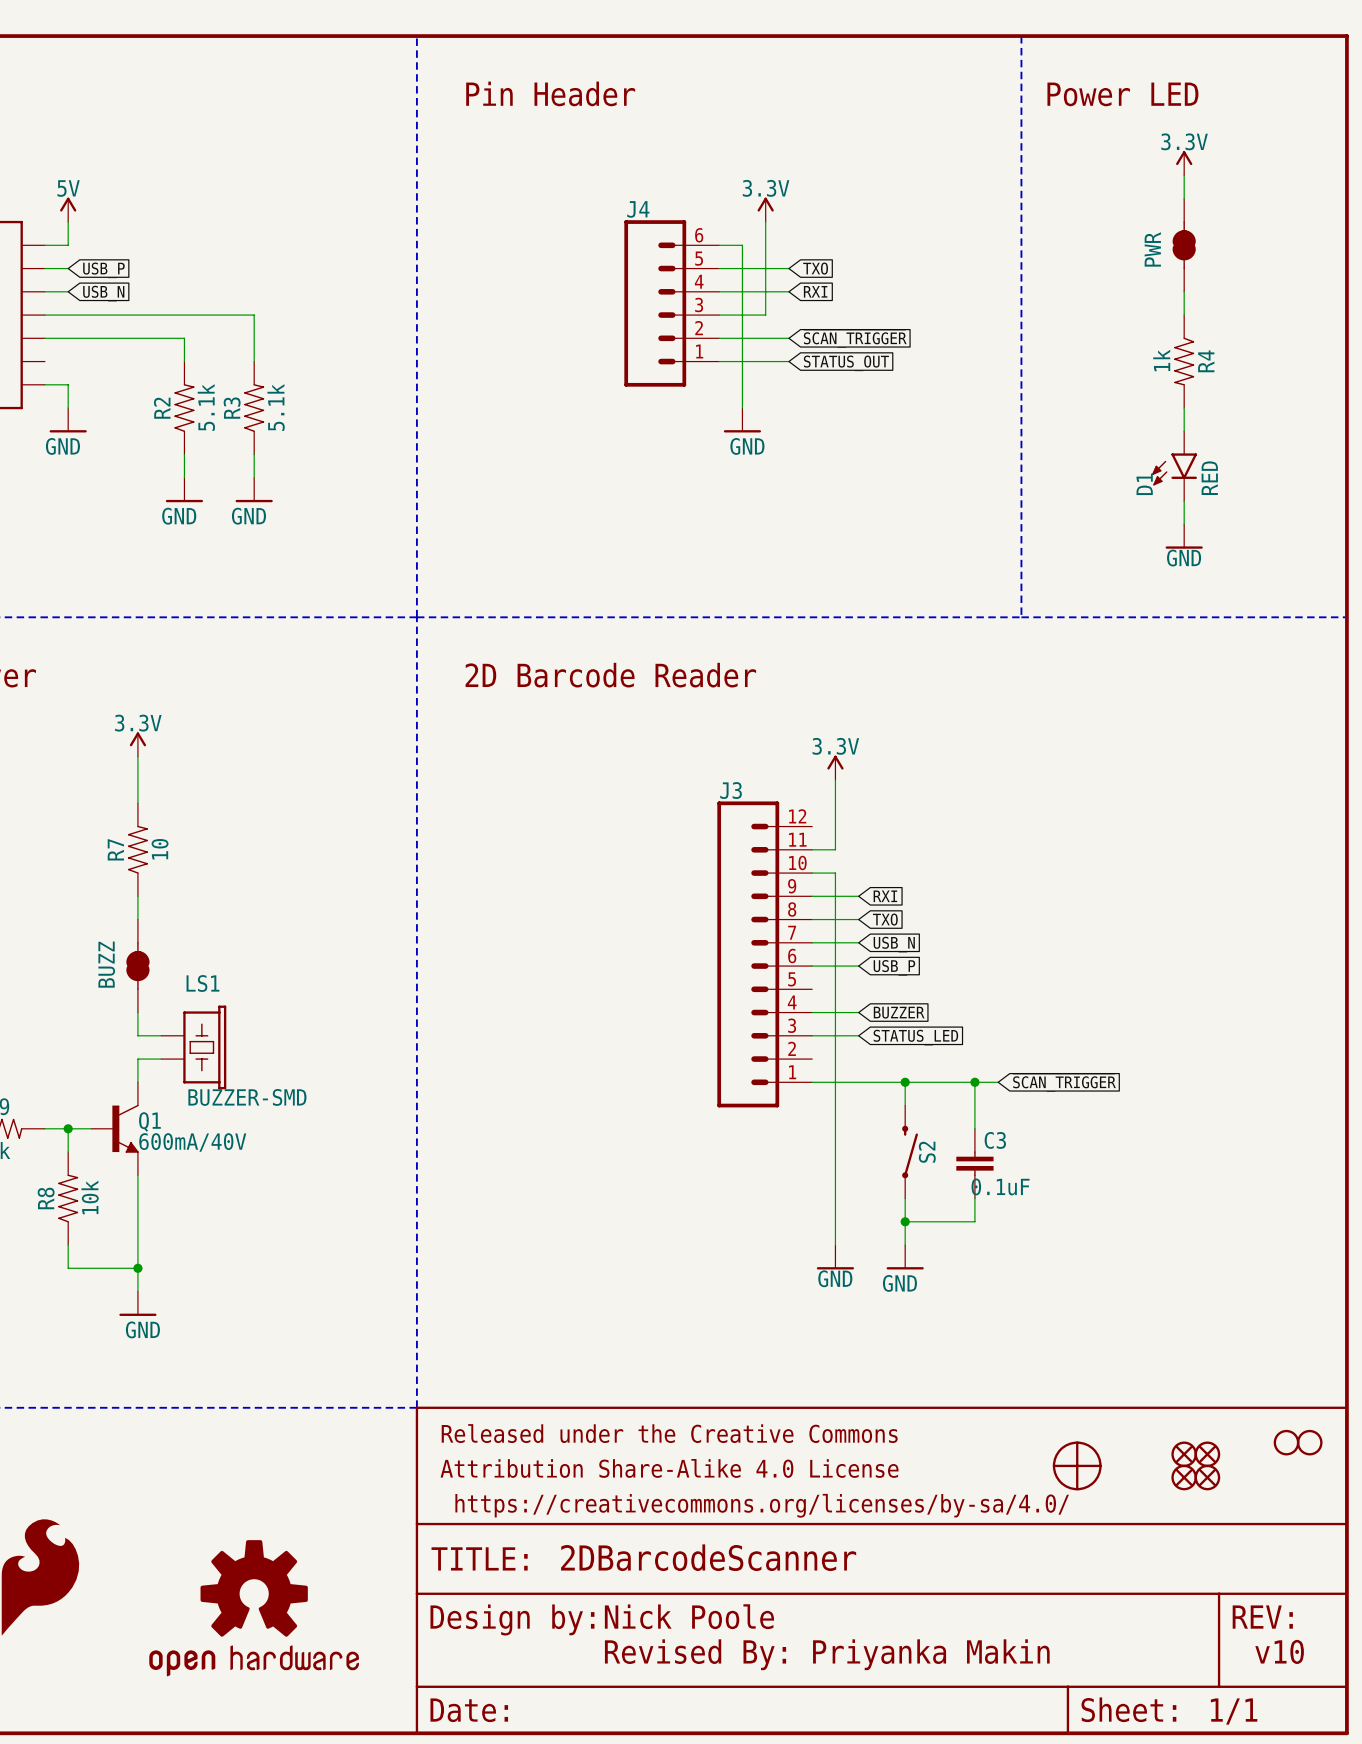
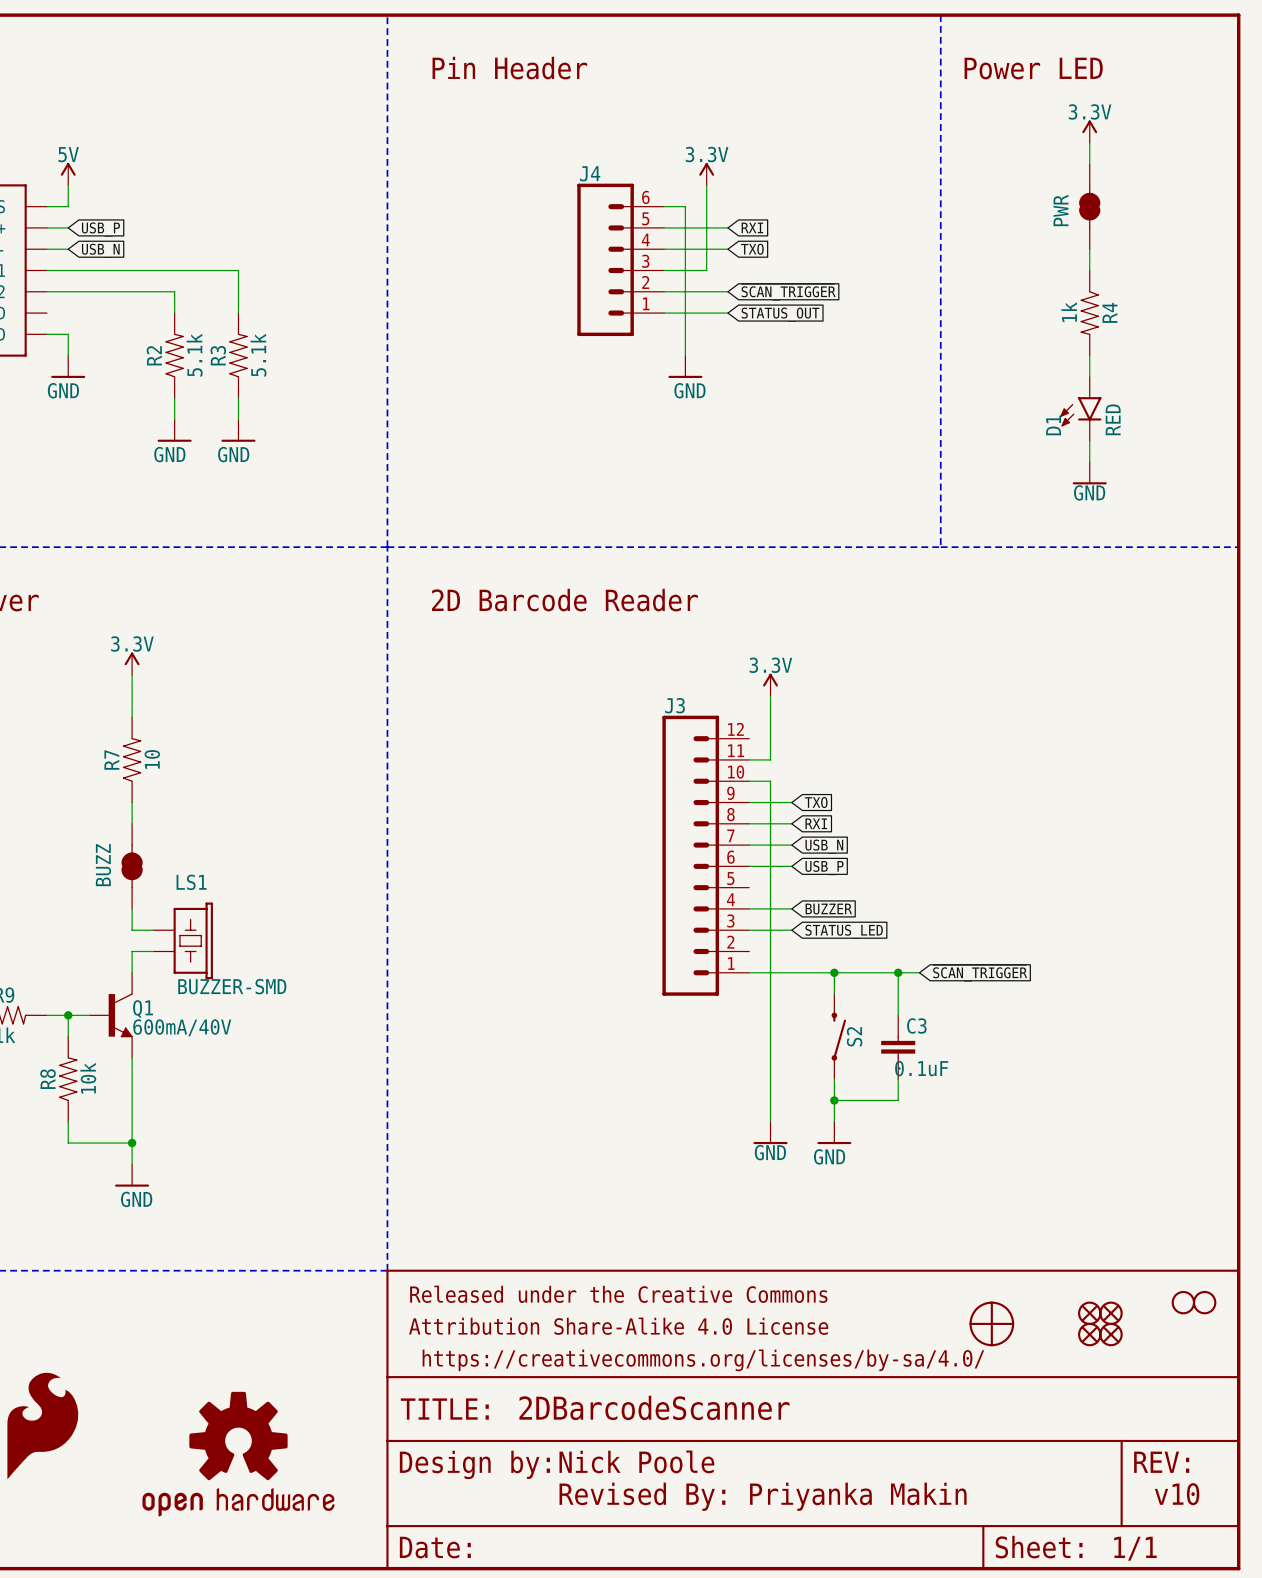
global label: TXO (815, 268) -> RXI (752, 227)
global label: RXI (815, 291) -> TXO (752, 249)
global label: RXI (885, 896) -> TXO (816, 802)
global label: TXO (885, 919) -> RXI (816, 823)

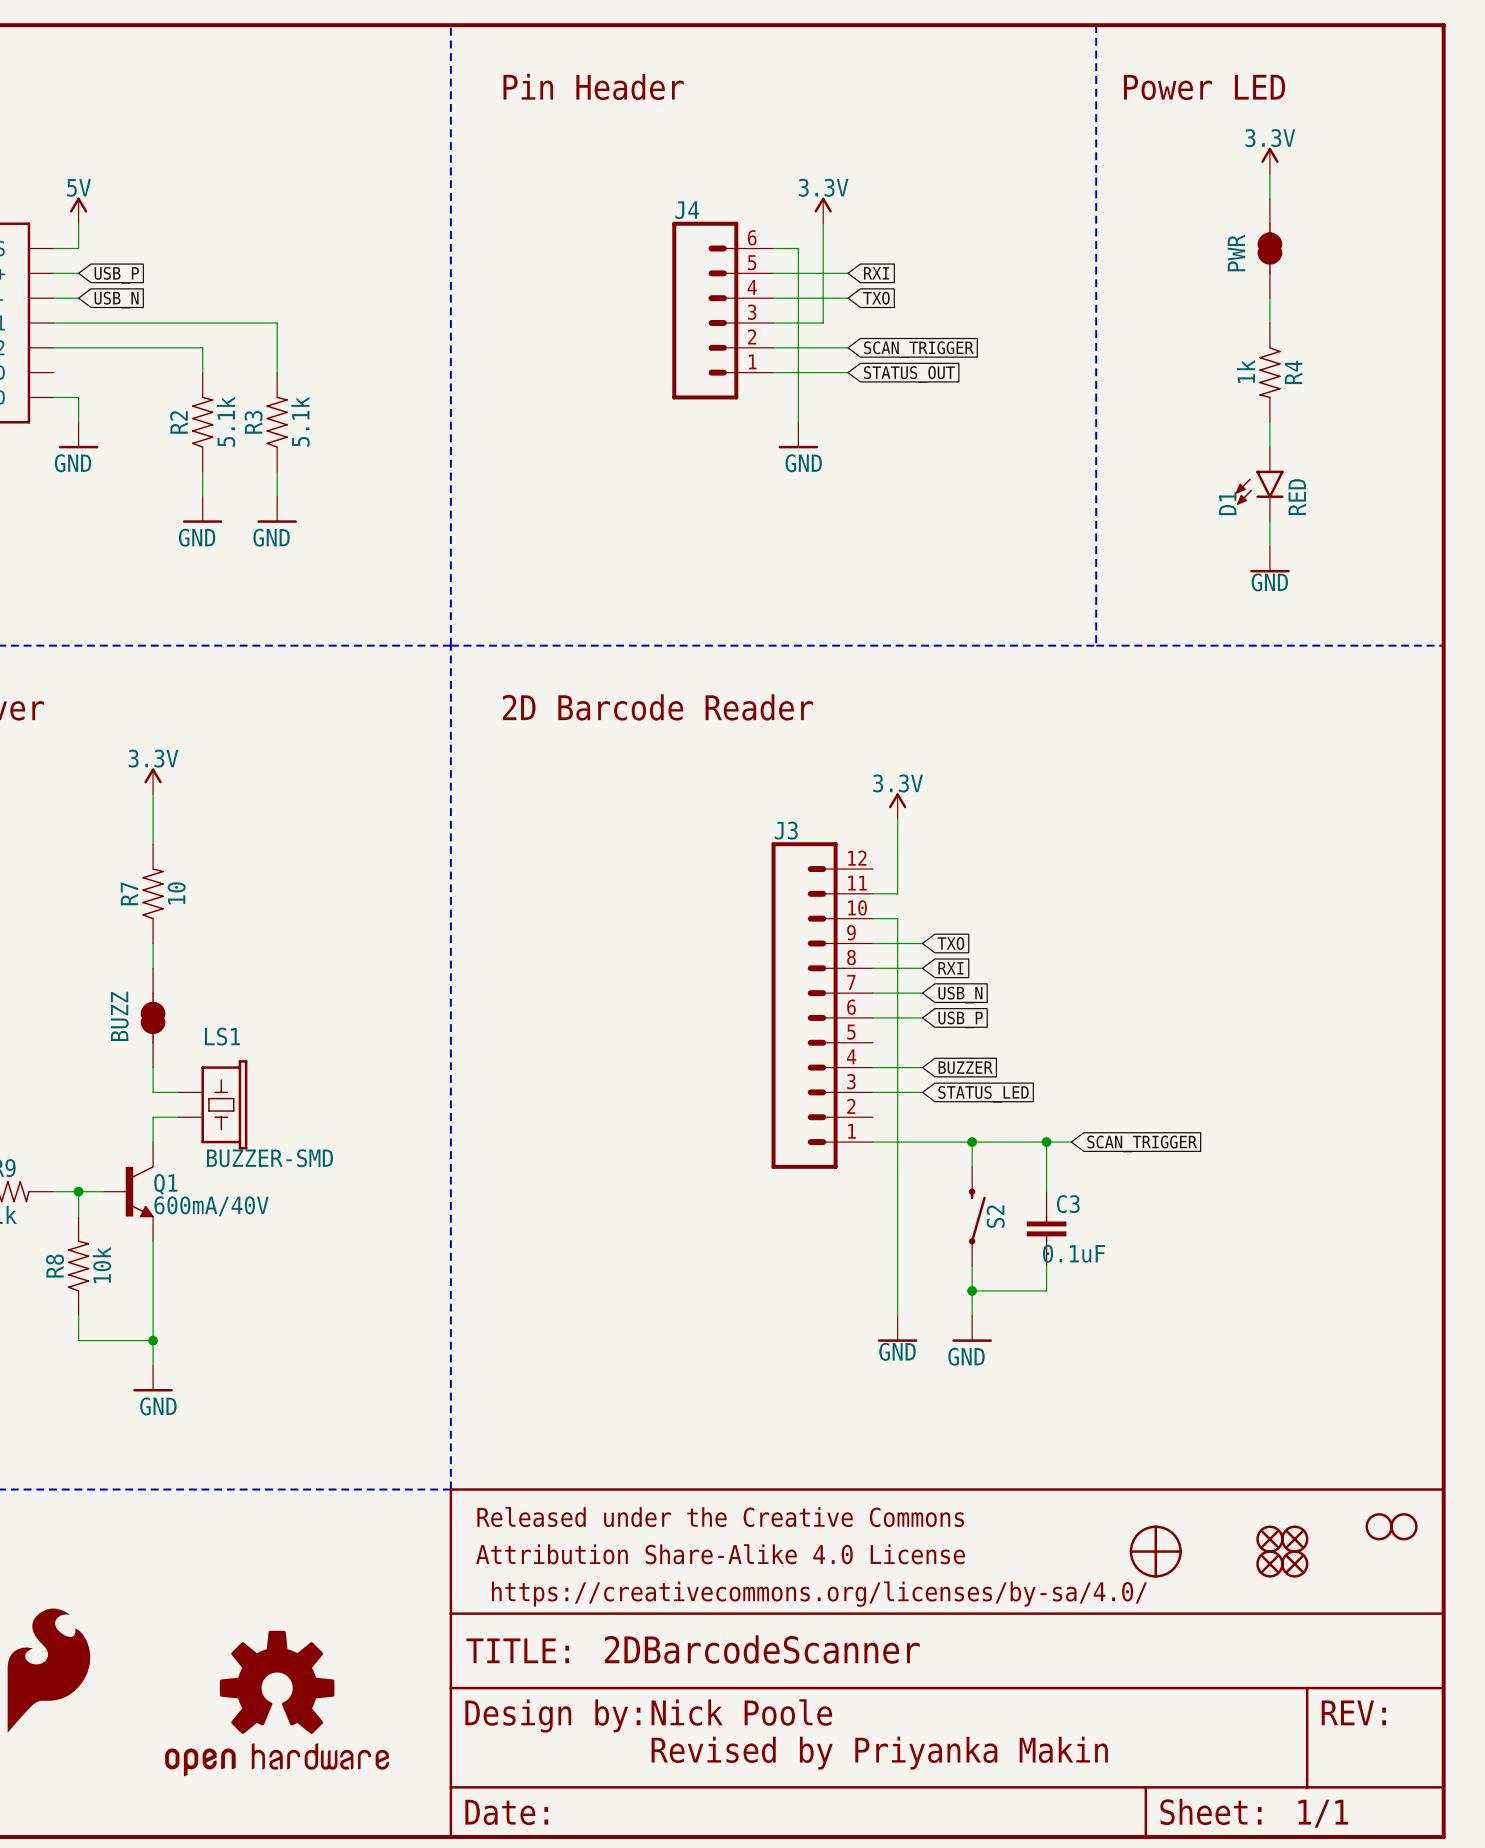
global label: ~{SCAN_TRIGGER} (788, 292) -> SCAN_TRIGGER (918, 349)
global label: ~{SCAN_TRIGGER} (980, 973) -> SCAN_TRIGGER (1142, 1143)
text: v10 (1177, 1494) -> none
text: Revised By: Priyanka Makin (763, 1496) -> Revised by Priyanka Makin (879, 1753)

